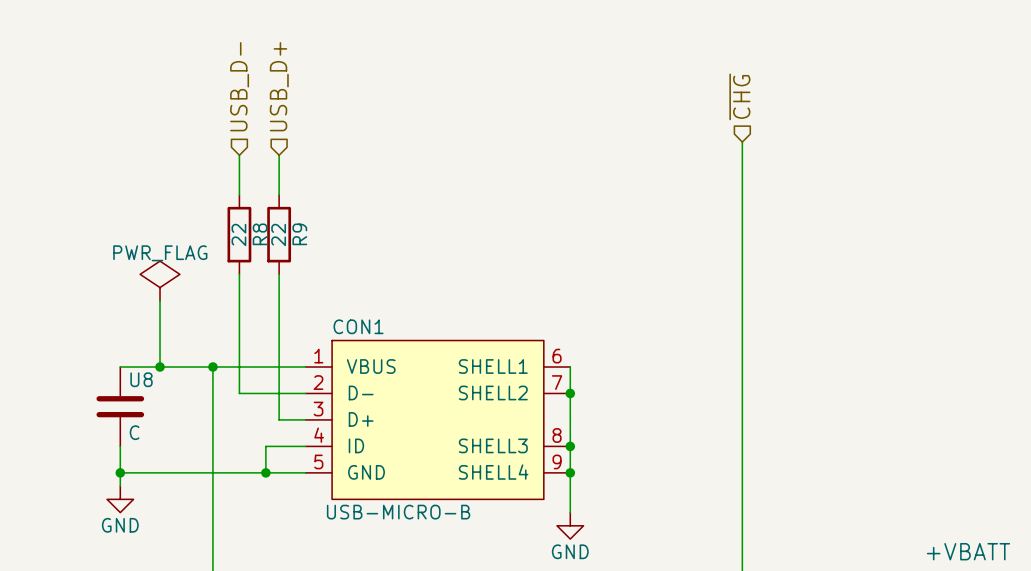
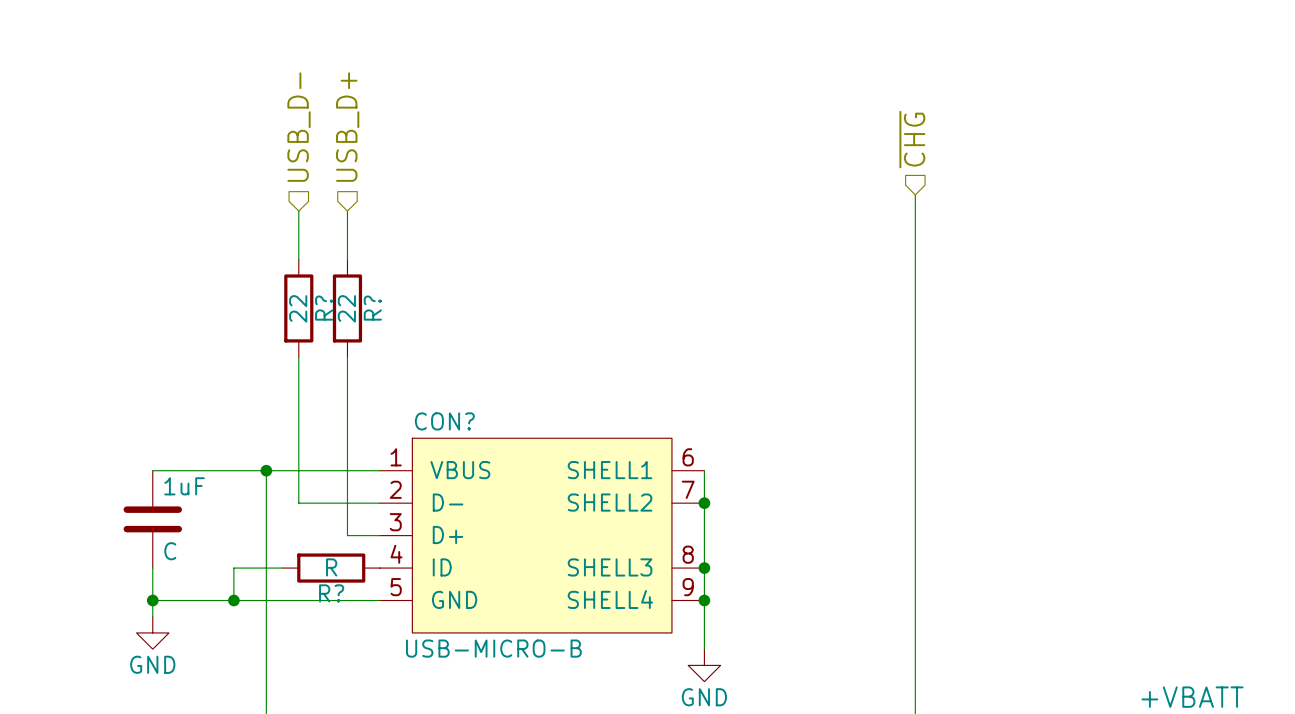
R8 name: R8 (260, 234) -> R? (324, 308)
R9 name: R9 (299, 234) -> R? (372, 308)
power symbol: PWR_FLAG (160, 280) -> none
wire: (160, 300) (160, 367) -> none
CON1 name: CON1 (358, 326) -> CON? (444, 421)
junction: (160, 367) -> none
U8 name: U8 (141, 379) -> 1uF (184, 486)
R?: none -> R (331, 568)
wire: (305, 446) (265, 446) (265, 472) -> (282, 568) (233, 568) (233, 600)
junction: none -> (233, 600)
junction: (265, 472) -> none

